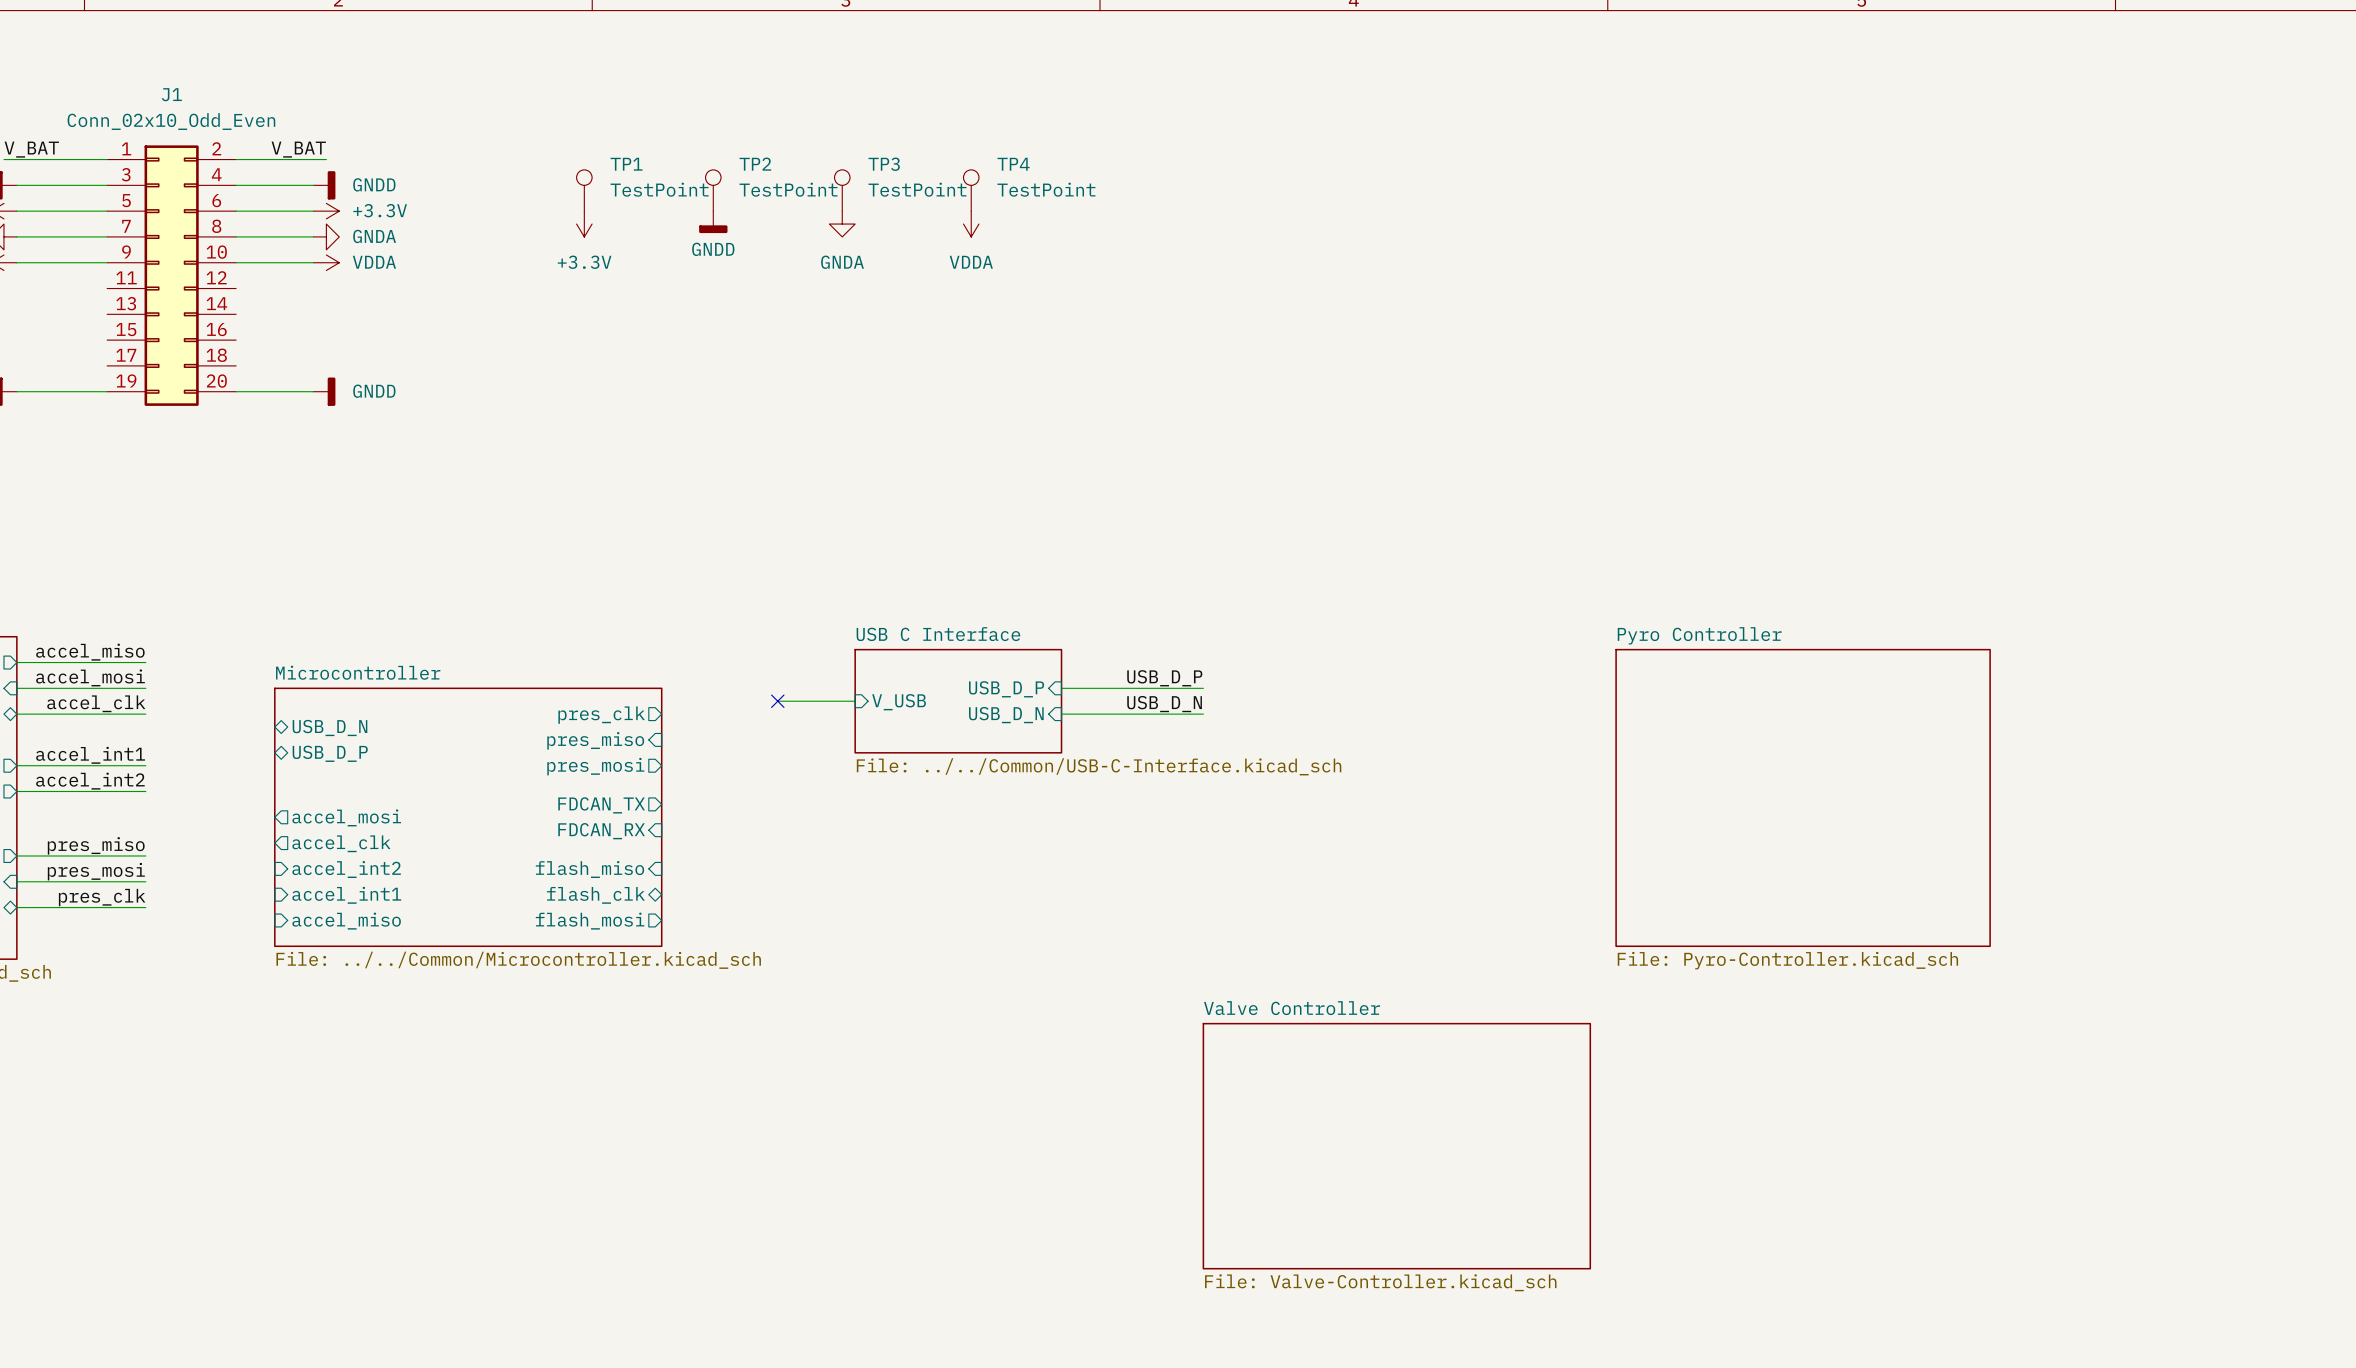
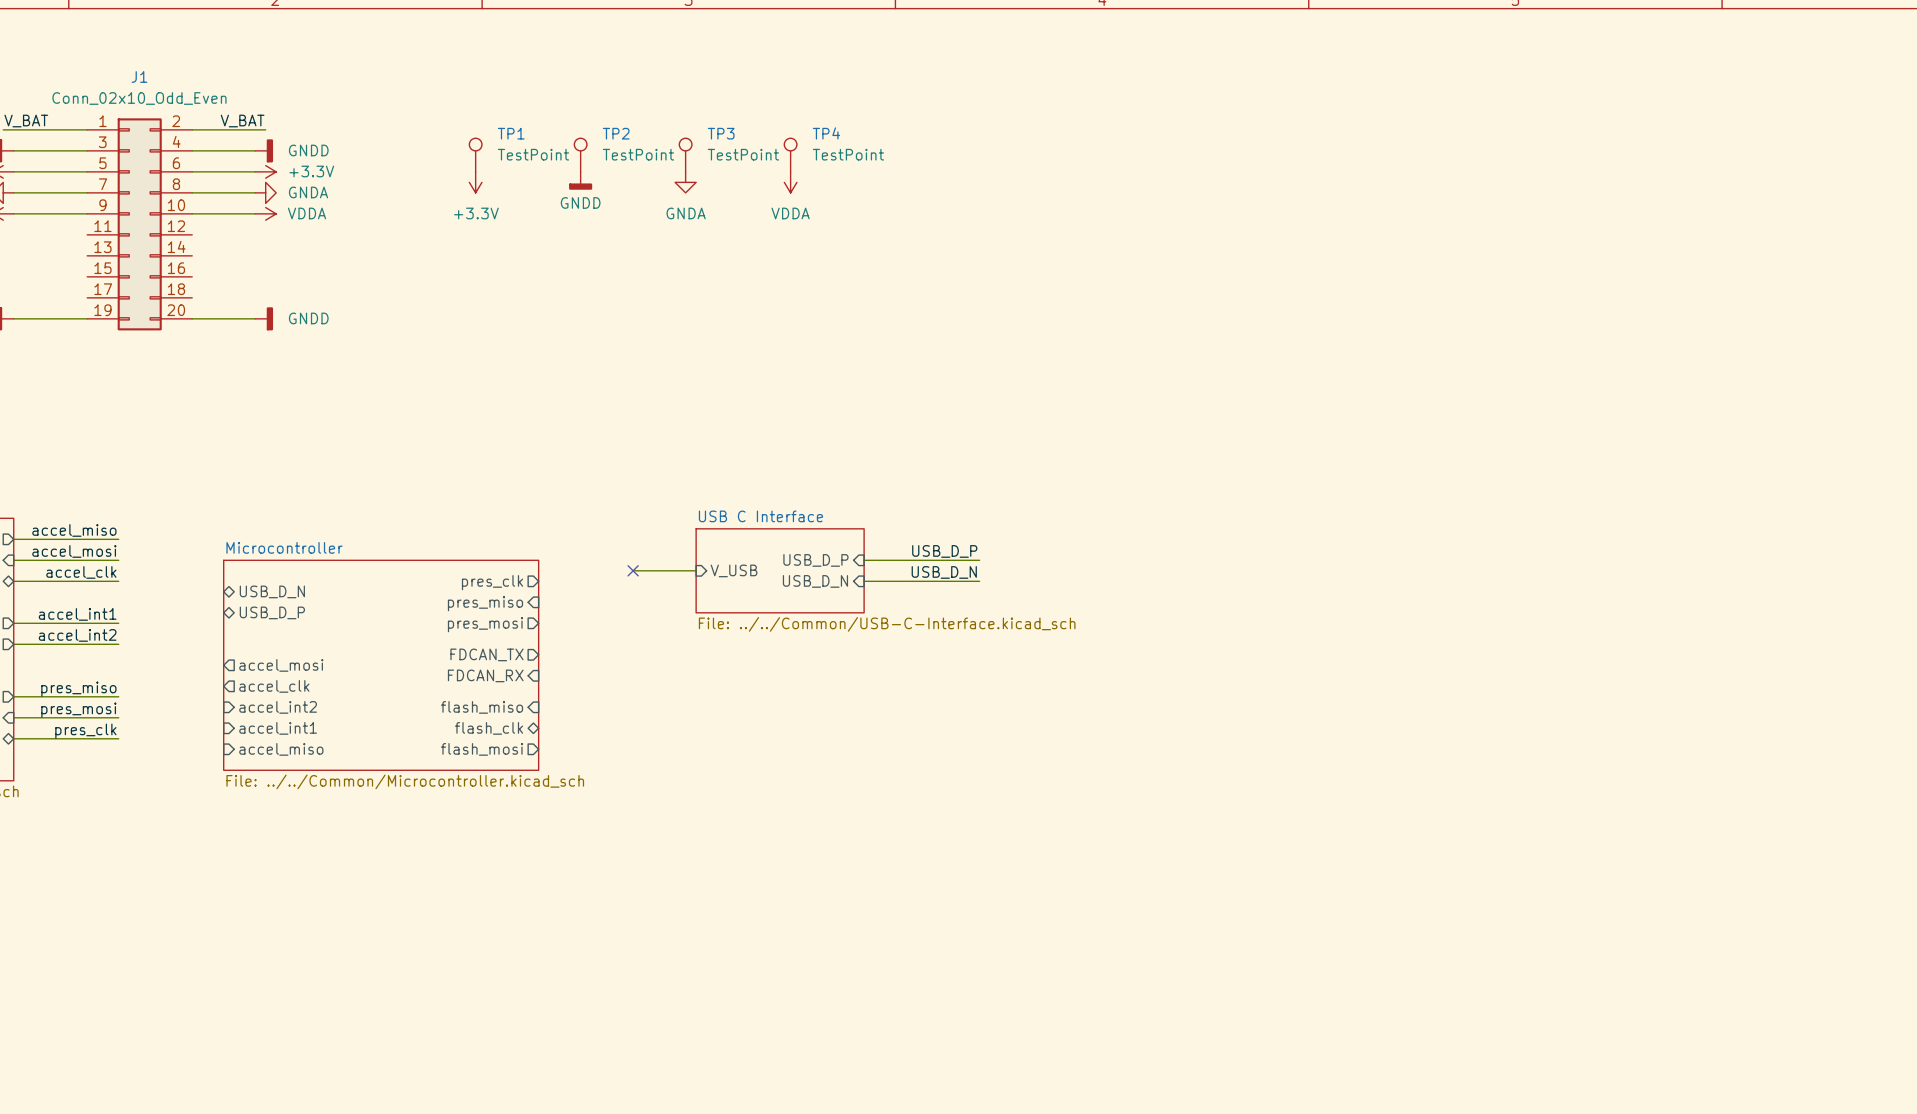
sheet Pyro Controller: File: Pyro-Controller.kicad_sch (1803, 797) -> none
sheet Valve Controller: File: Valve-Controller.kicad_sch (1396, 1146) -> none

